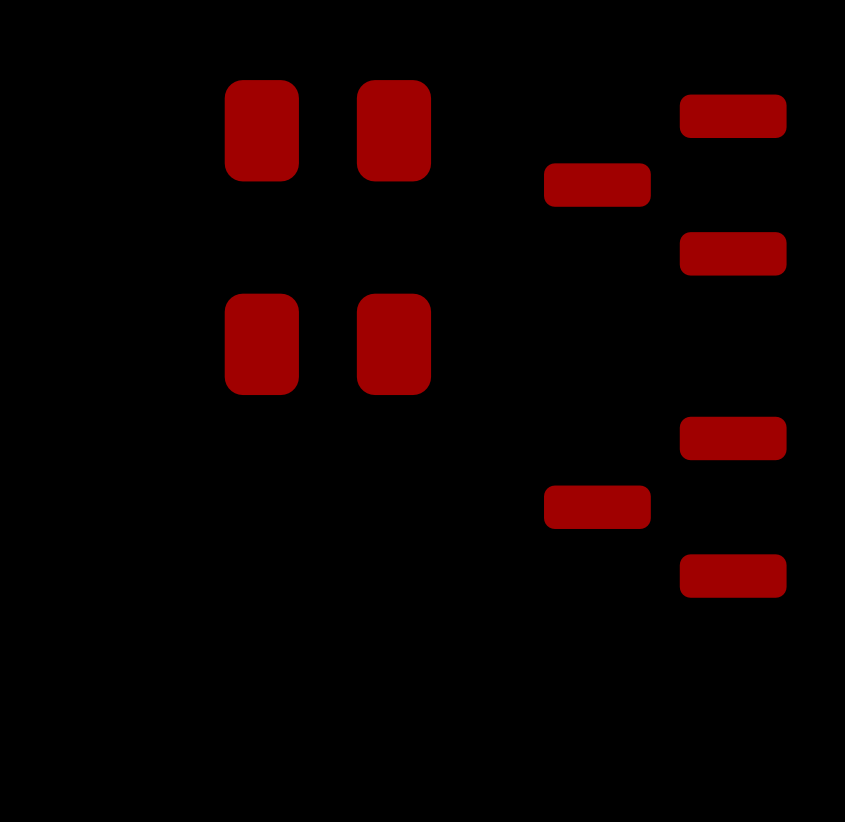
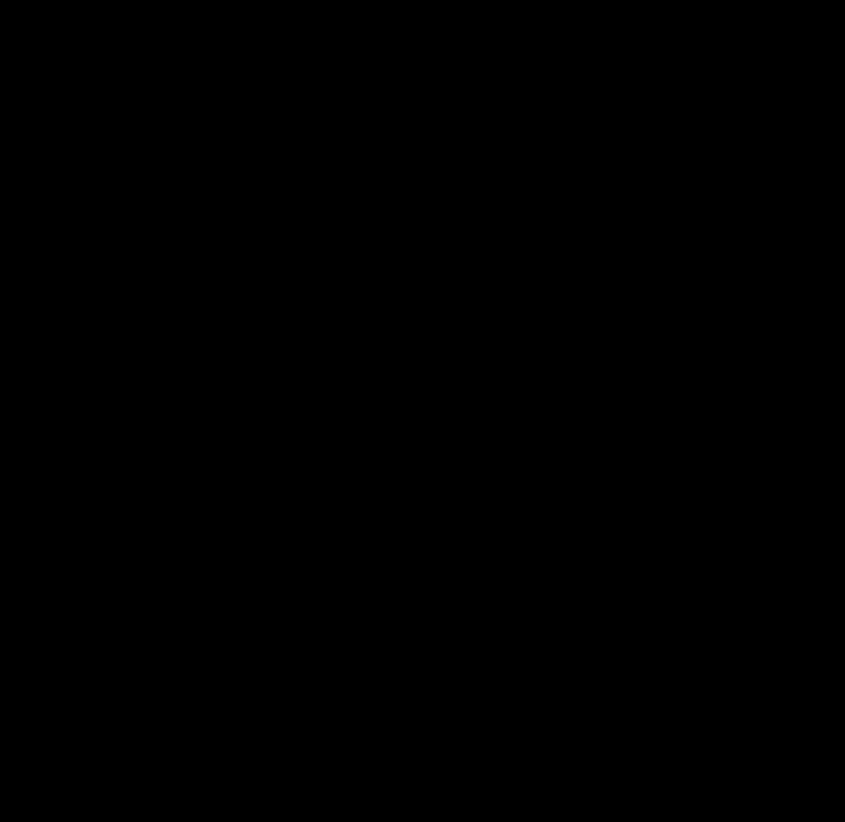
part: (327, 130) -> none
part: (665, 185) -> none
part: (327, 344) -> none
part: (665, 507) -> none

